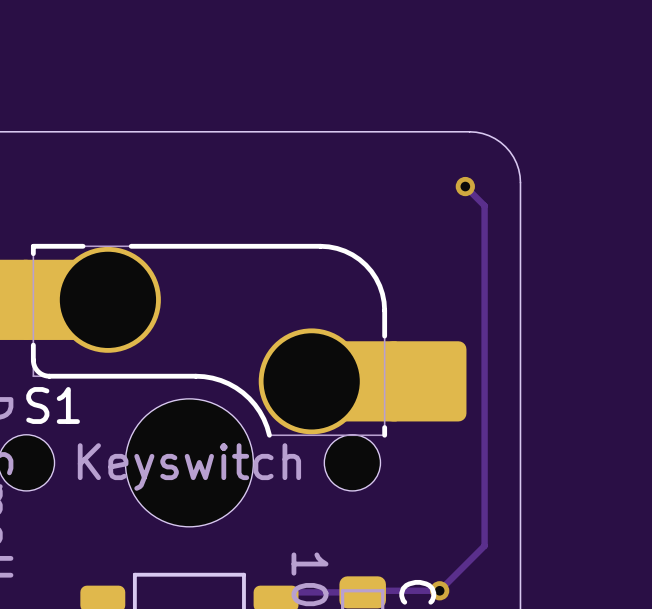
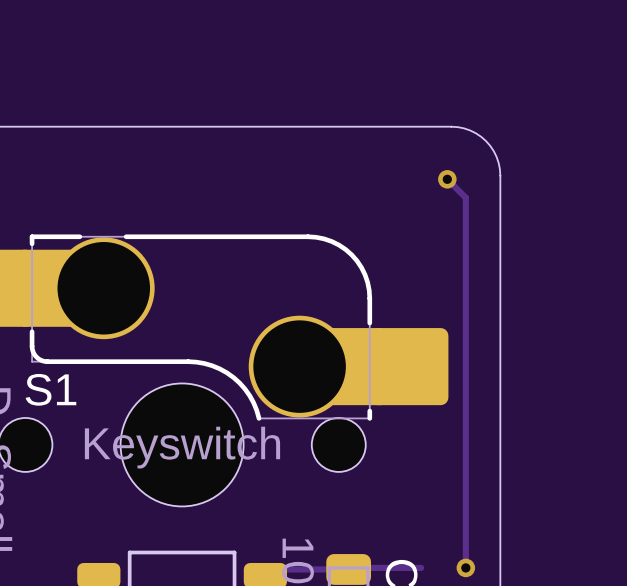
track: (484, 545) (439, 590) -> (465, 524) (465, 567)
via position: (439, 590) -> (465, 567)

